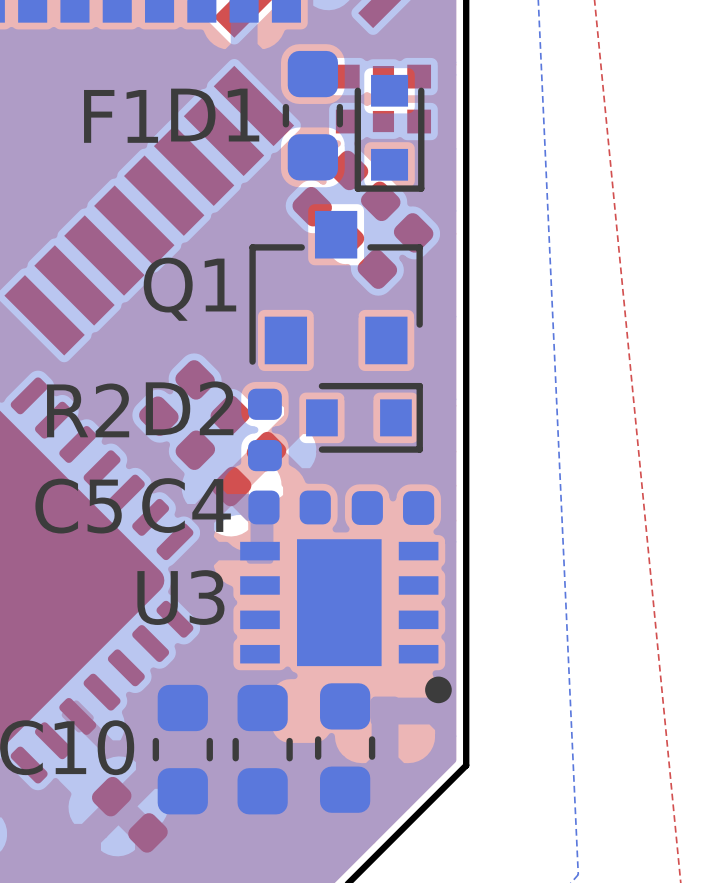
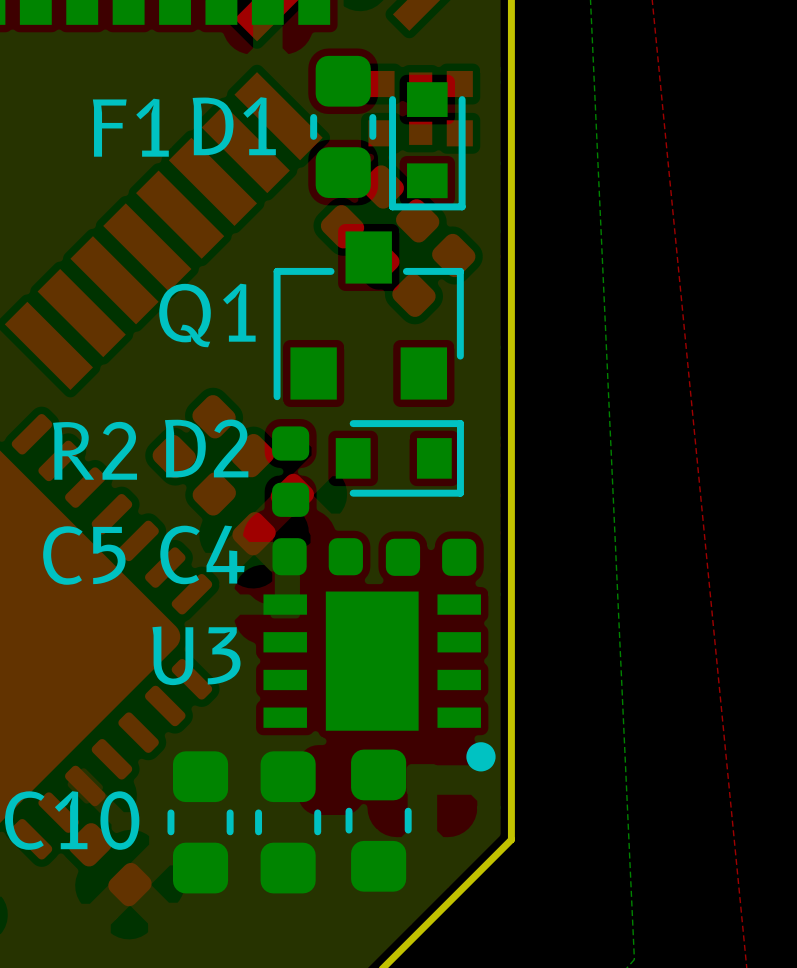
part position: (129, 814) -> (110, 864)

